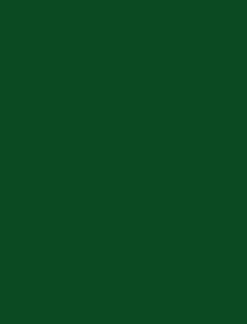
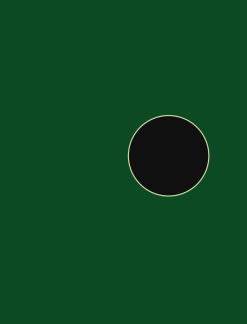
part: none -> (168, 155)

